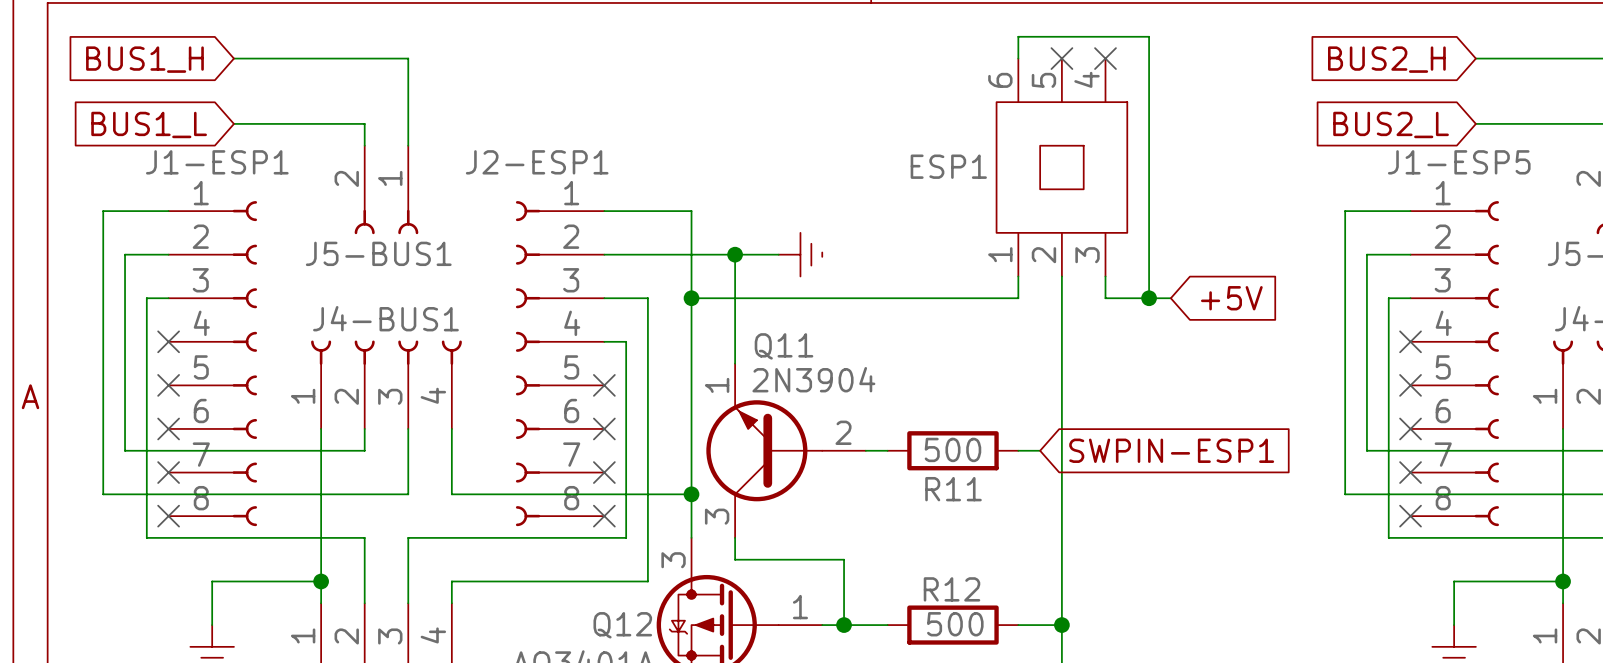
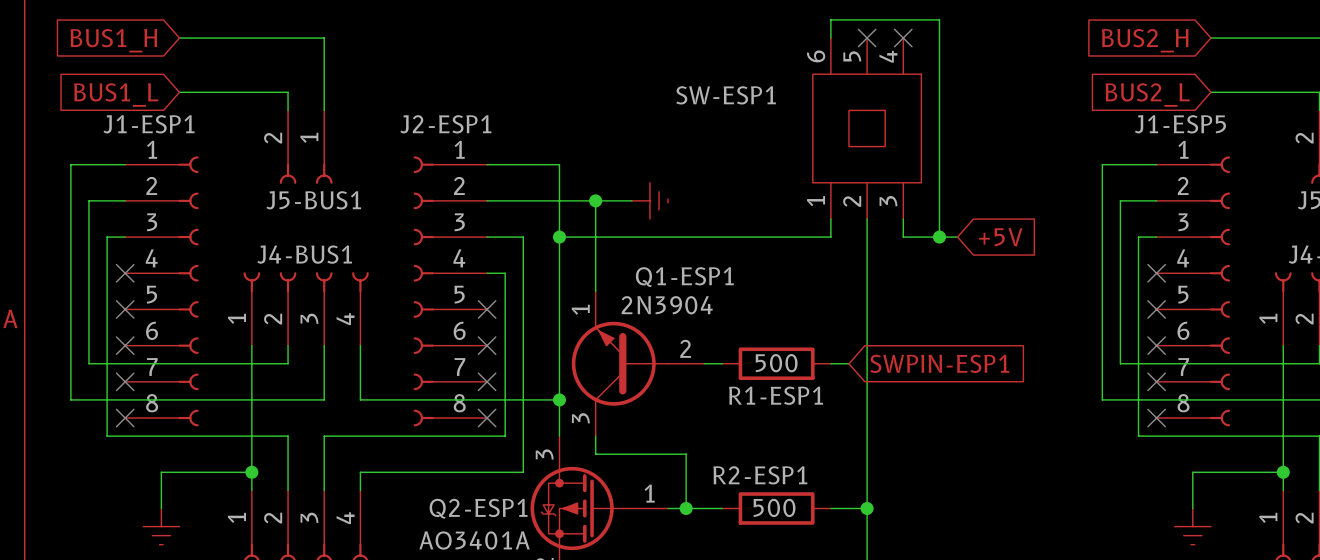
ESP1 name: ESP1 (948, 166) -> SW-ESP1 (726, 95)
Q11 name: Q11 (784, 346) -> Q1-ESP1 (684, 277)
R11 name: R11 (953, 489) -> R1-ESP1 (776, 395)
R12 name: R12 (952, 589) -> R2-ESP1 (760, 475)
Q12 name: Q12 (622, 625) -> Q2-ESP1 (478, 508)

